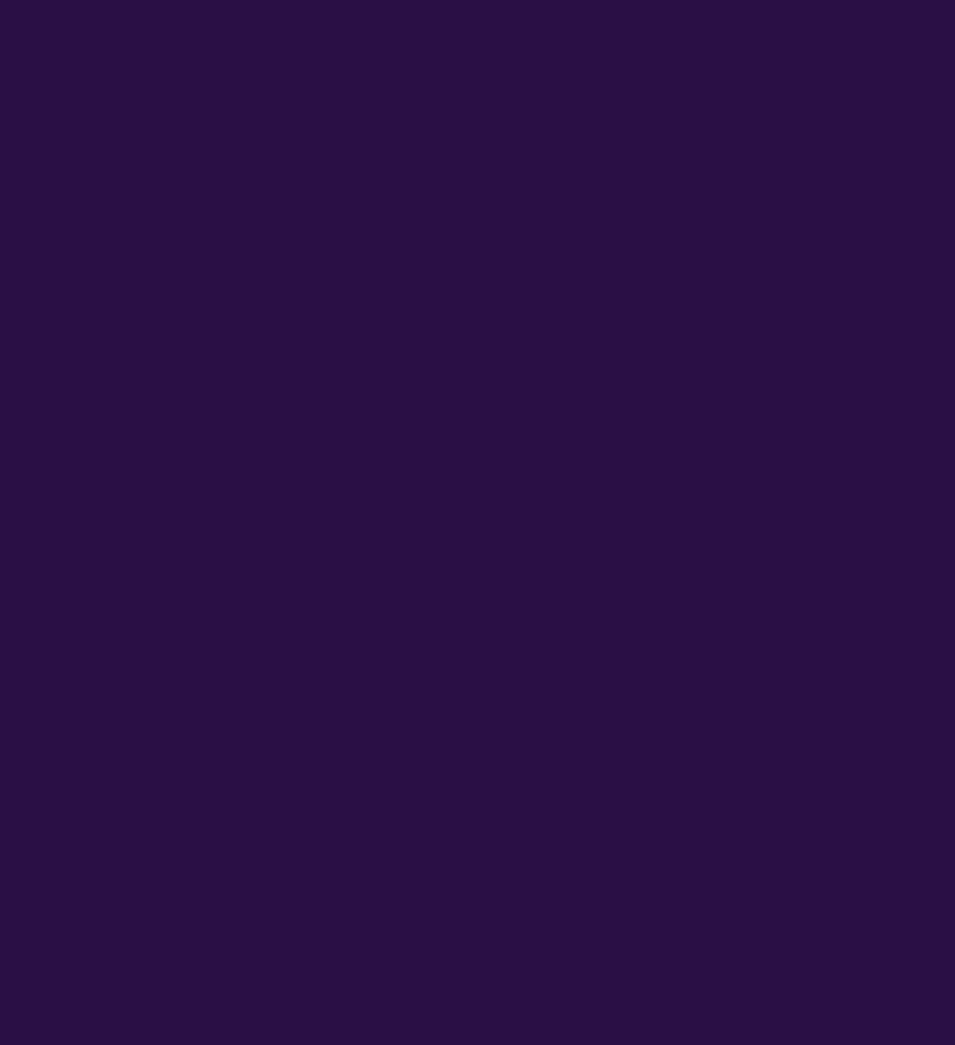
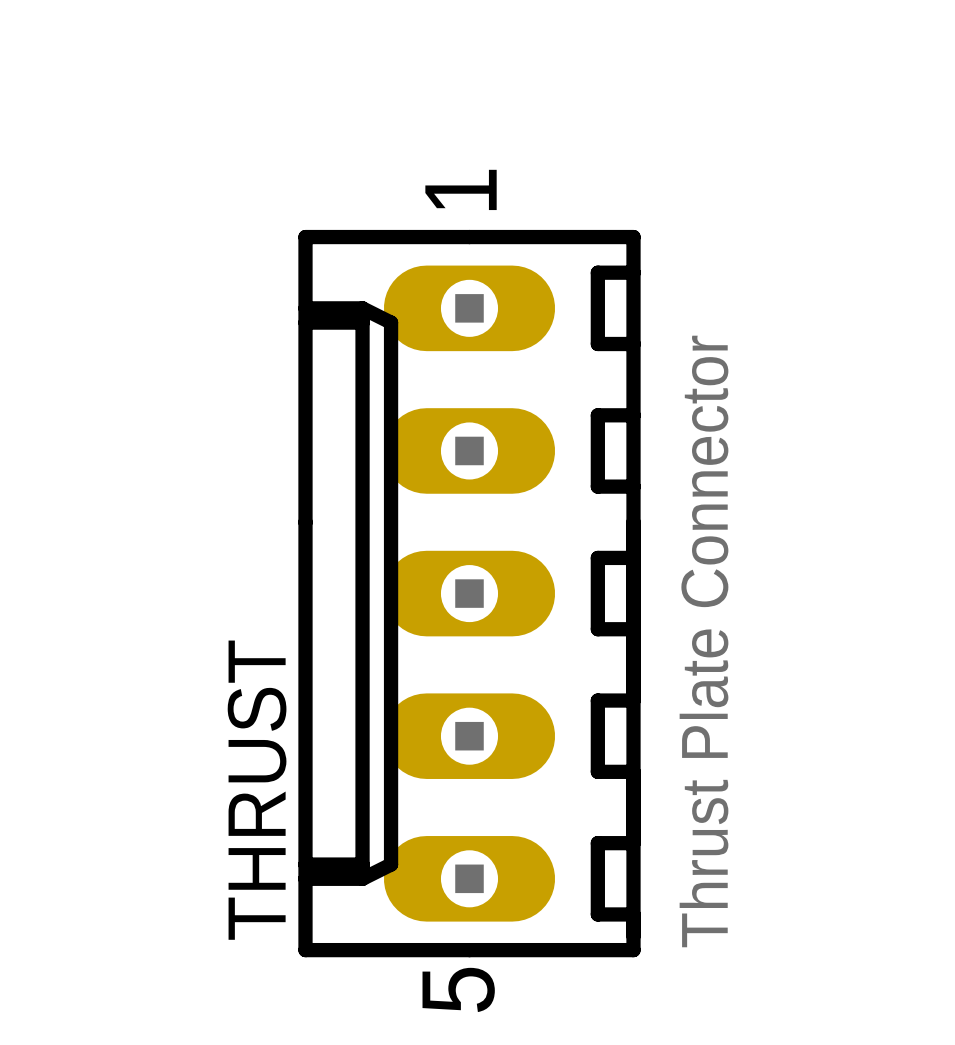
THRUST: none -> Thrust Plate Connector (469, 593)

